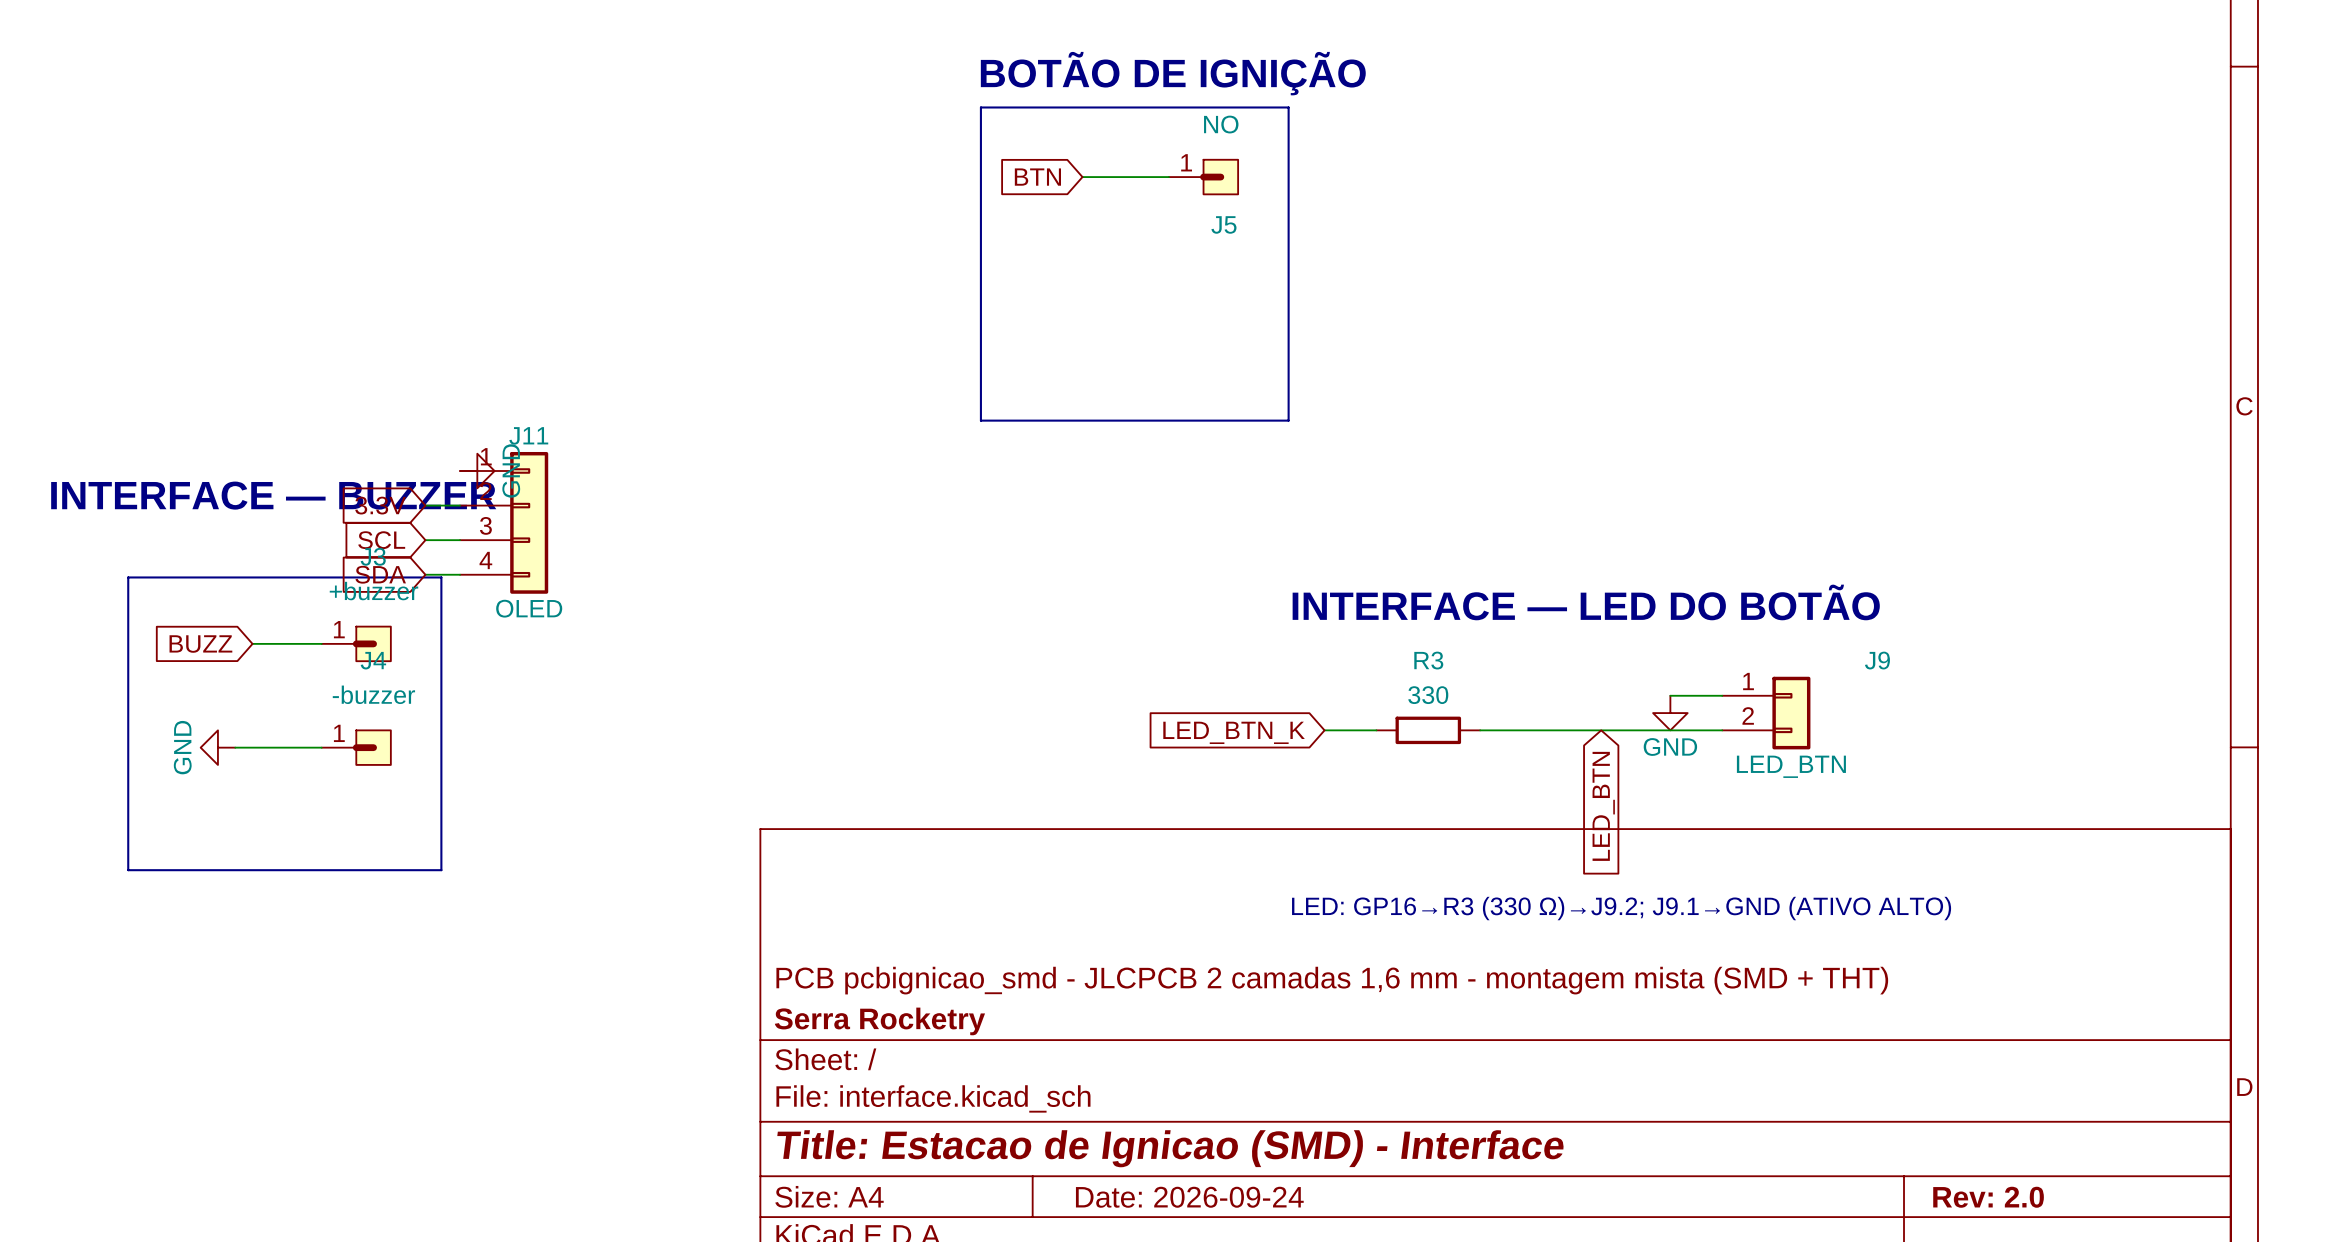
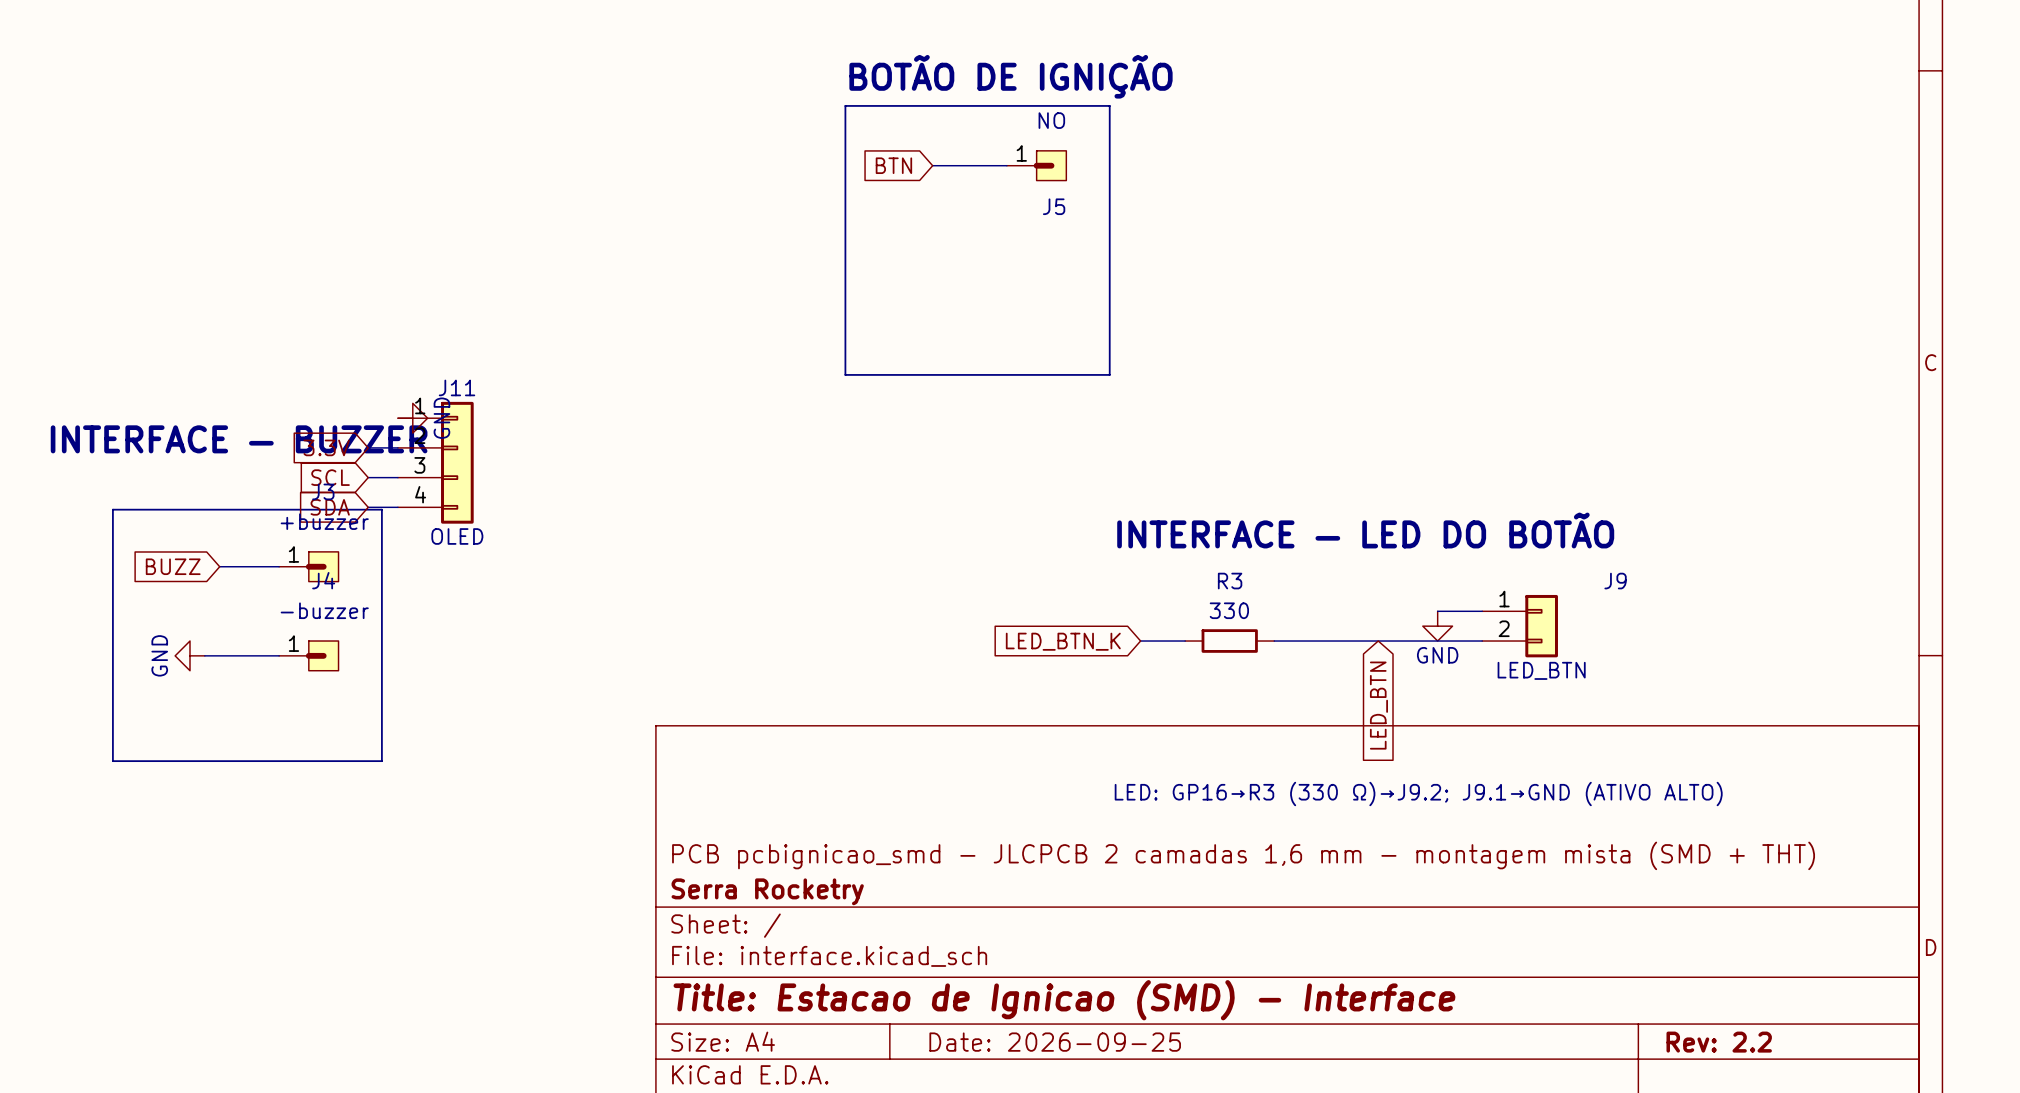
title block: Date: 2026-09-24 (1189, 1197) -> Date: 2026-09-25 (1055, 1042)
title block: Rev: 2.0 (1988, 1197) -> Rev: 2.2 (1719, 1042)

